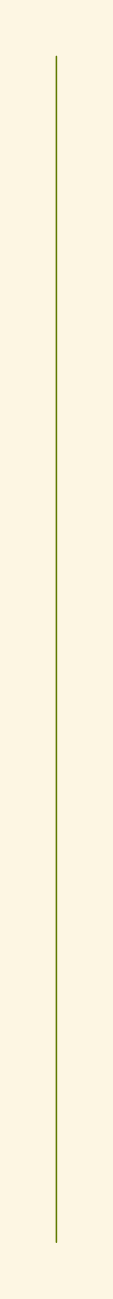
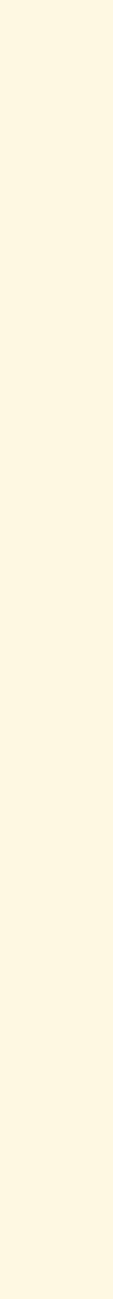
wire: (56, 56) (56, 1242) -> none

